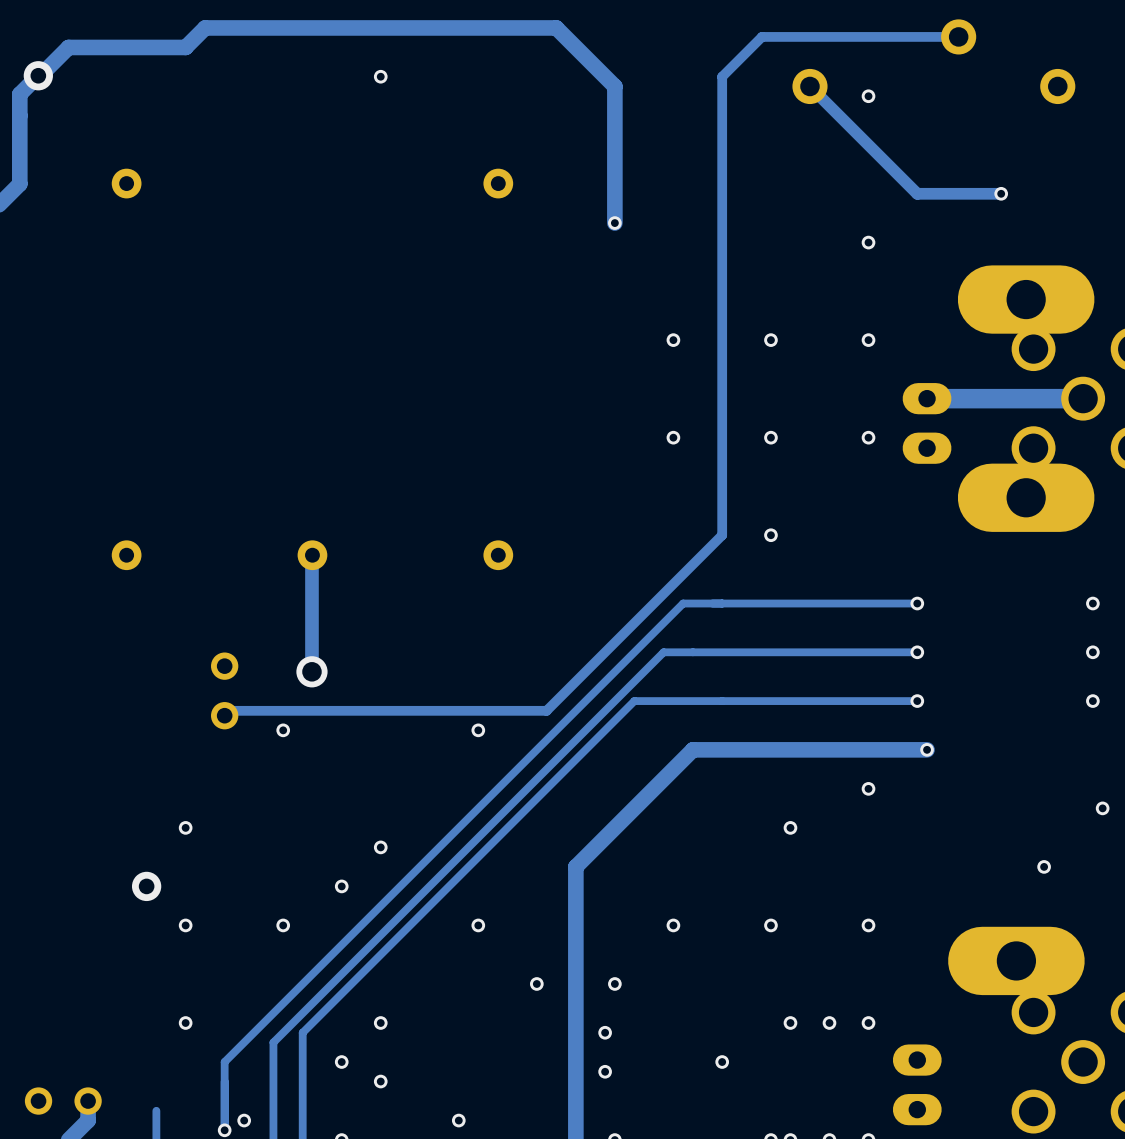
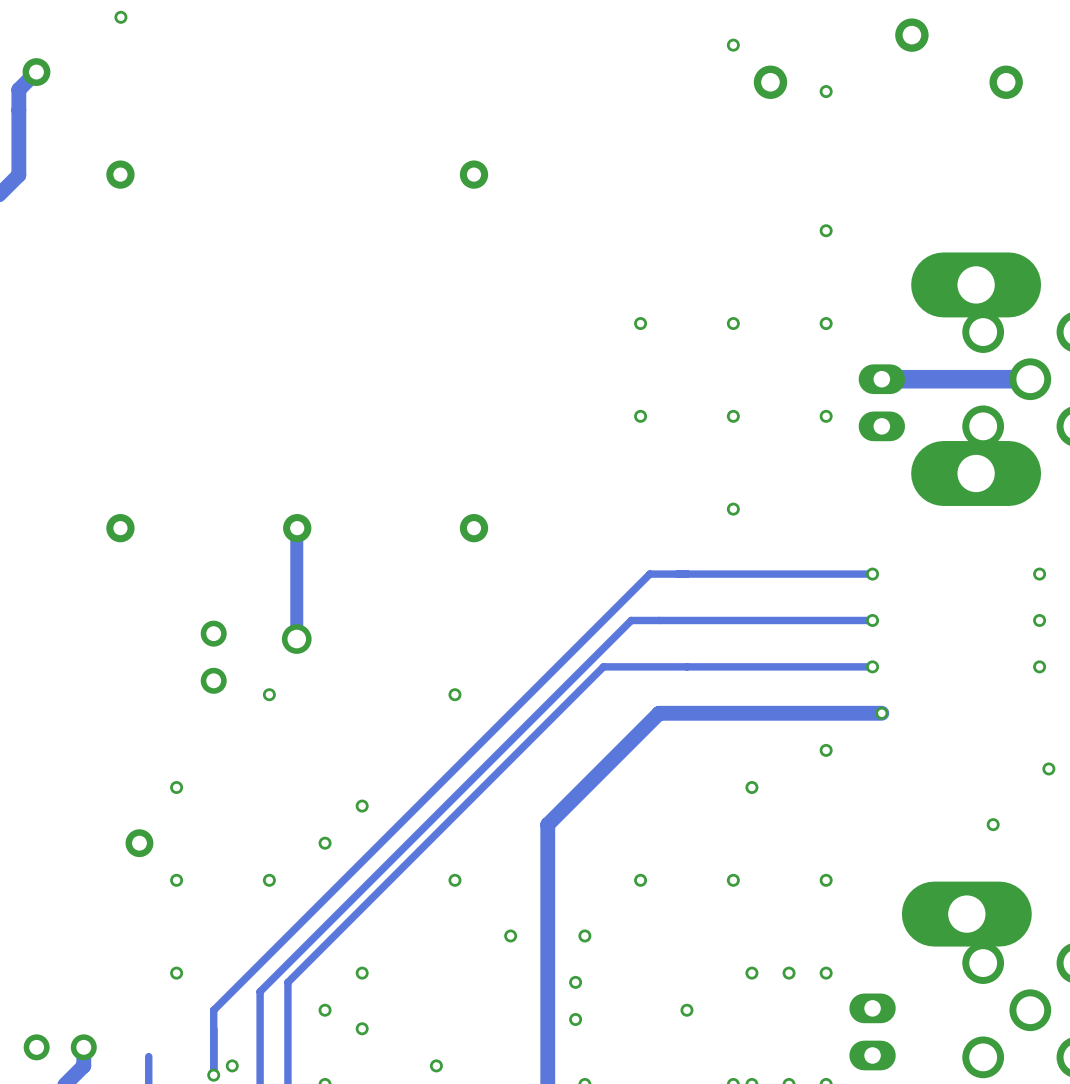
via: none -> (120, 17)
track: (958, 36) (761, 36) (722, 76) (722, 535) (546, 710) (229, 710) (224, 715) -> none
via: none -> (733, 45)
track: (38, 75) (68, 47) (185, 47) (205, 27) (556, 27) (614, 86) (614, 223) -> none
via: (380, 76) -> none
track: (809, 86) (917, 193) (1001, 193) -> none
via: (1001, 193) -> none
via: (614, 223) -> none

